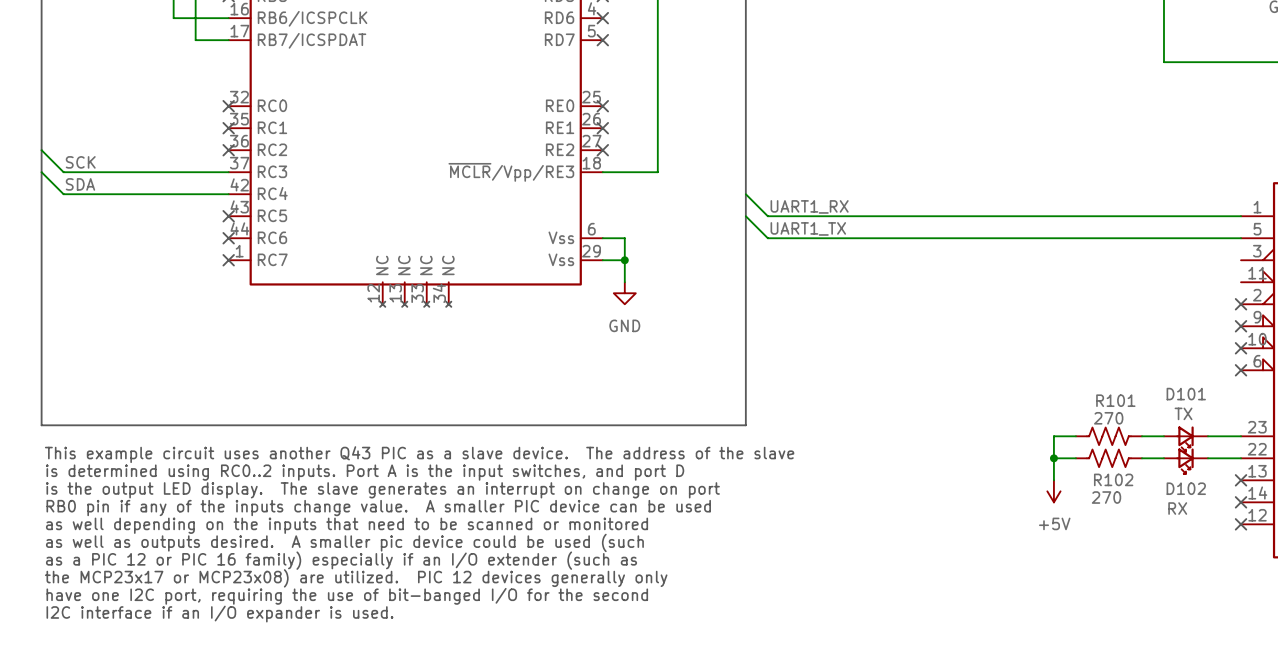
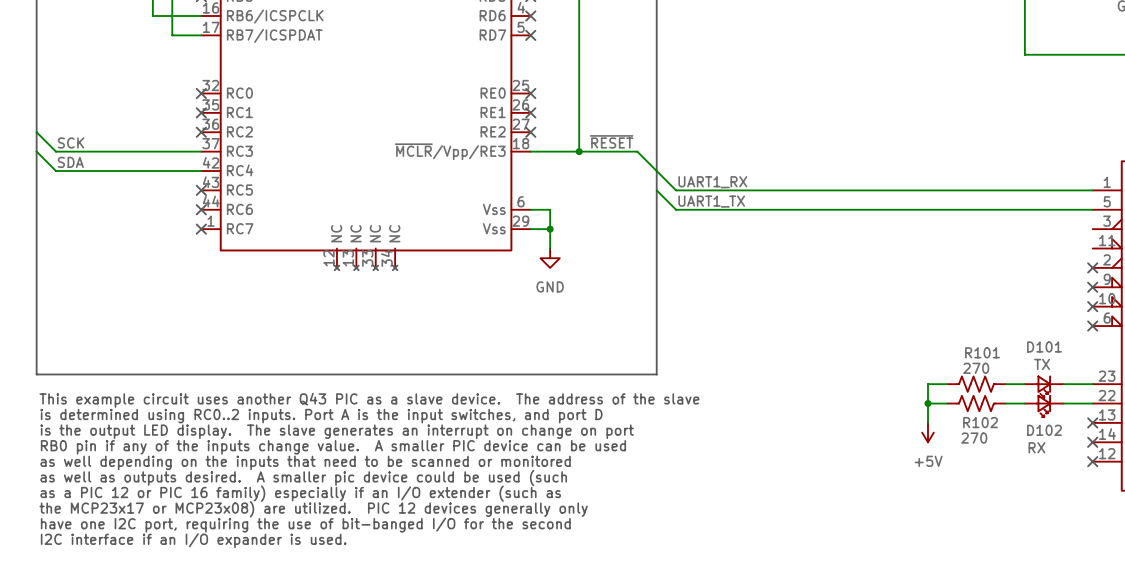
label: none -> ~{RESET} (611, 141)
wire: none -> (579, 151) (637, 151) (656, 171)
junction: none -> (579, 151)

